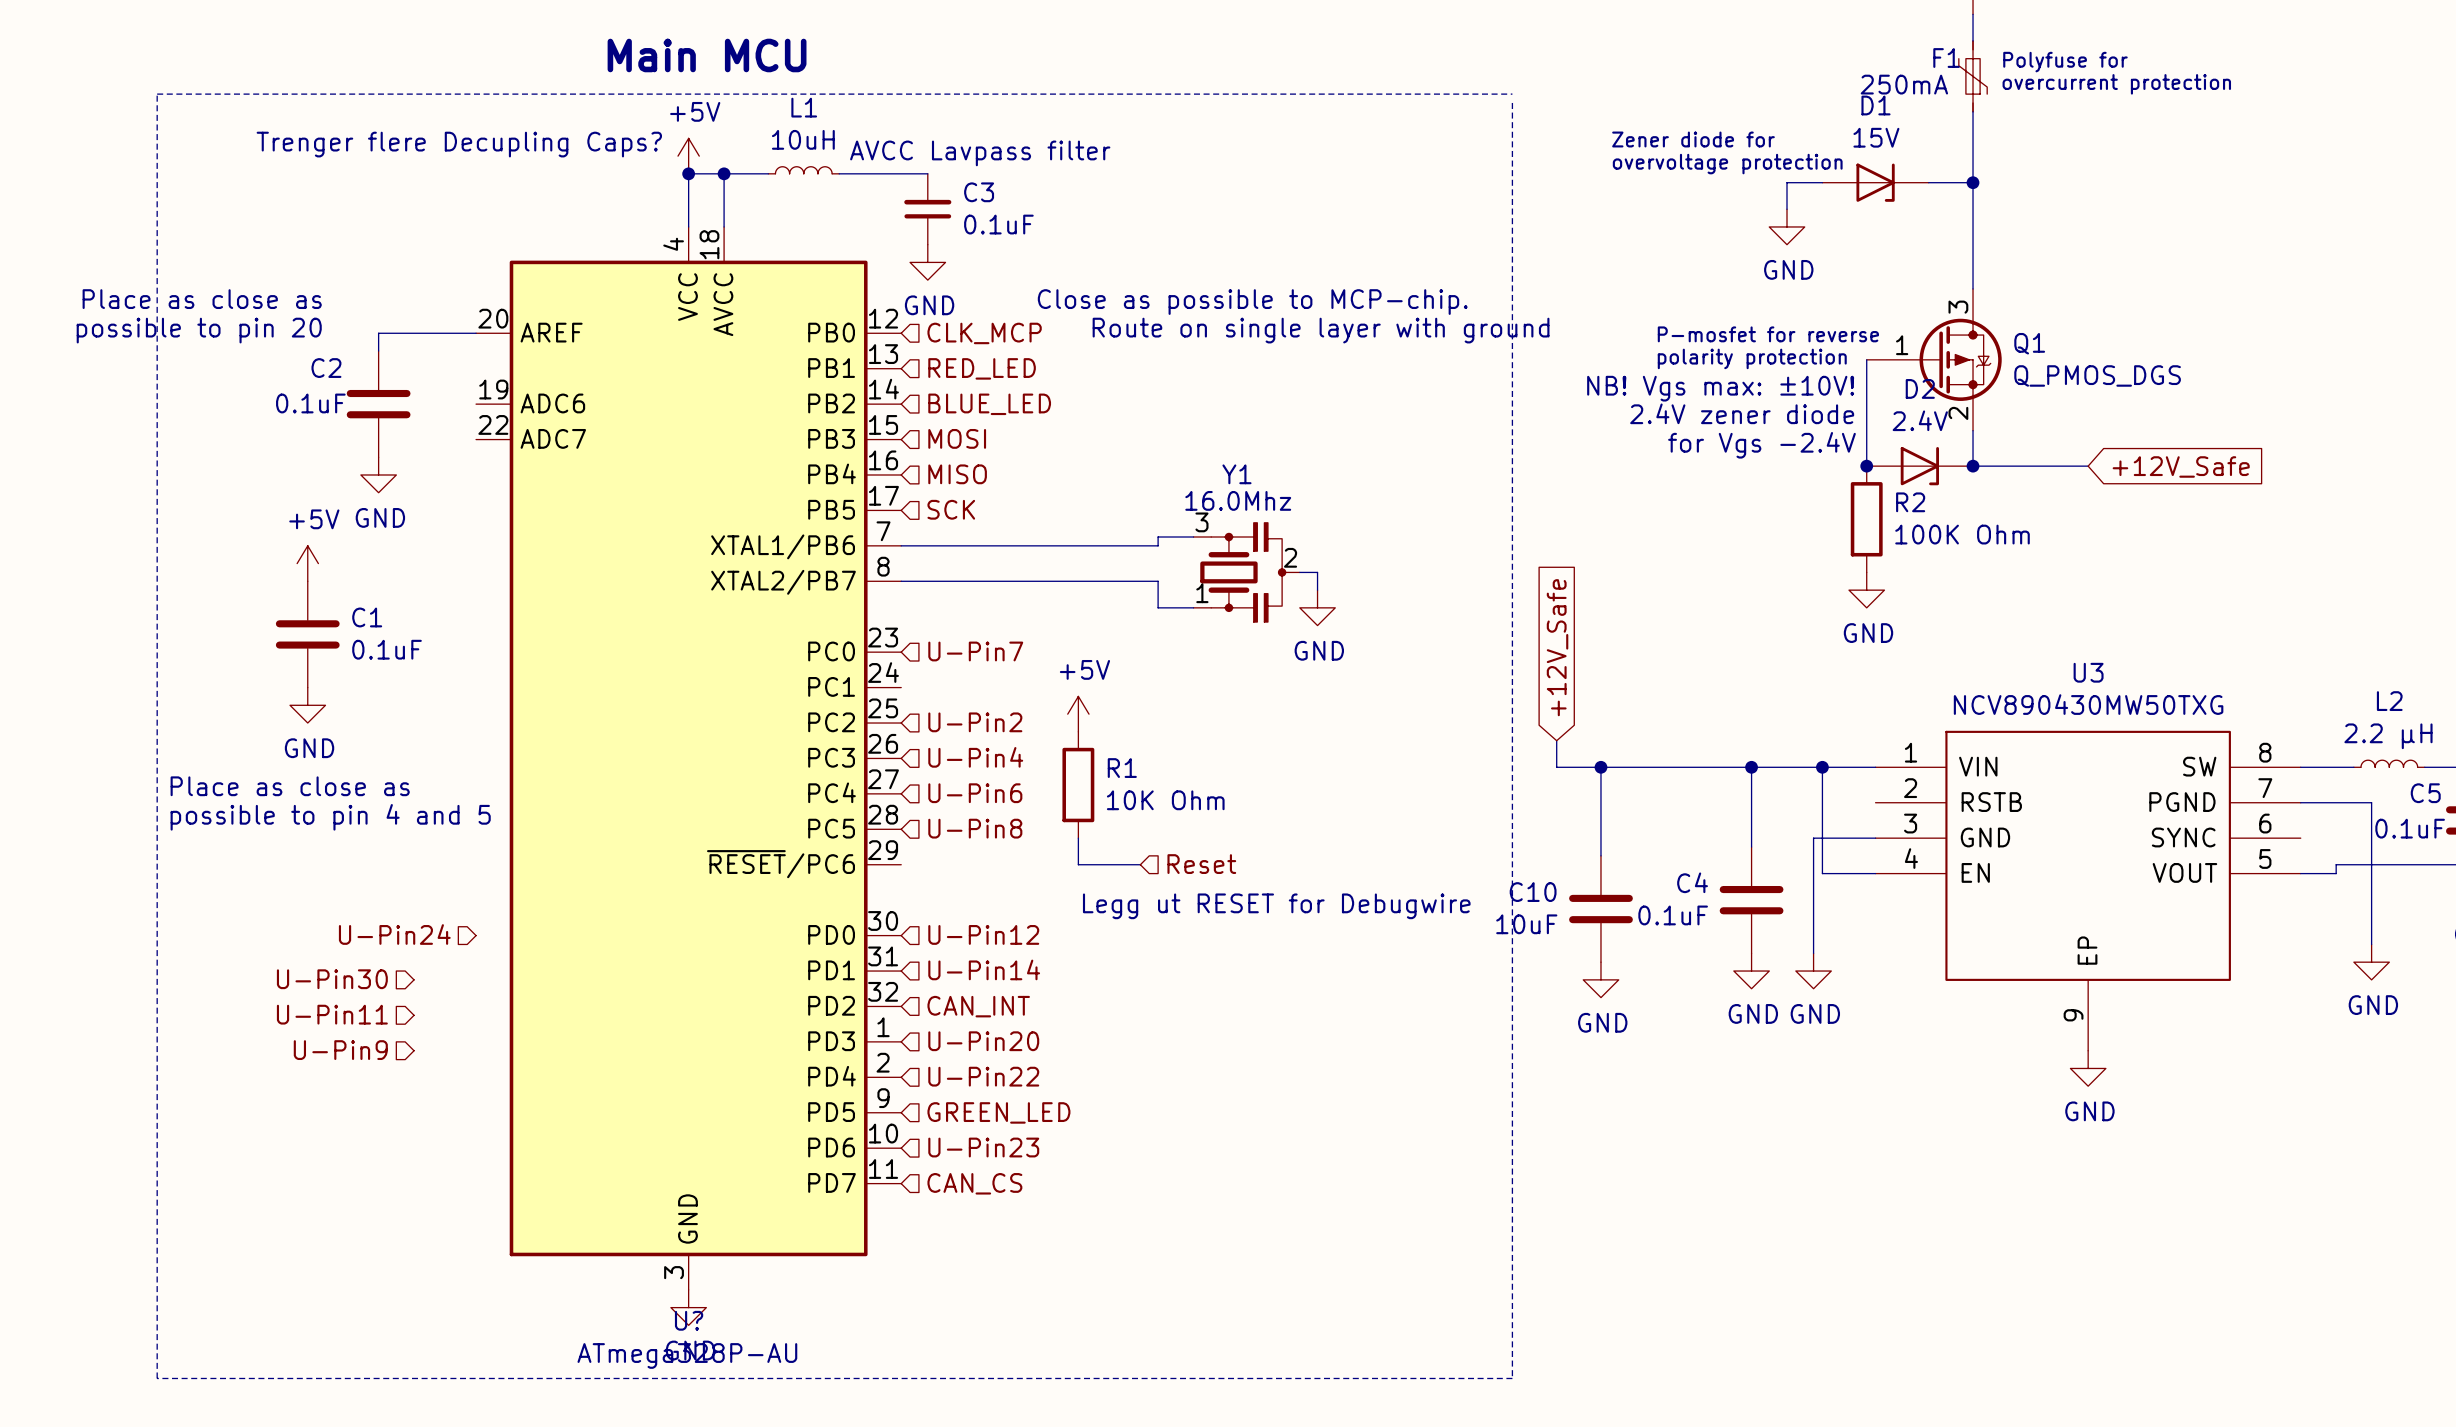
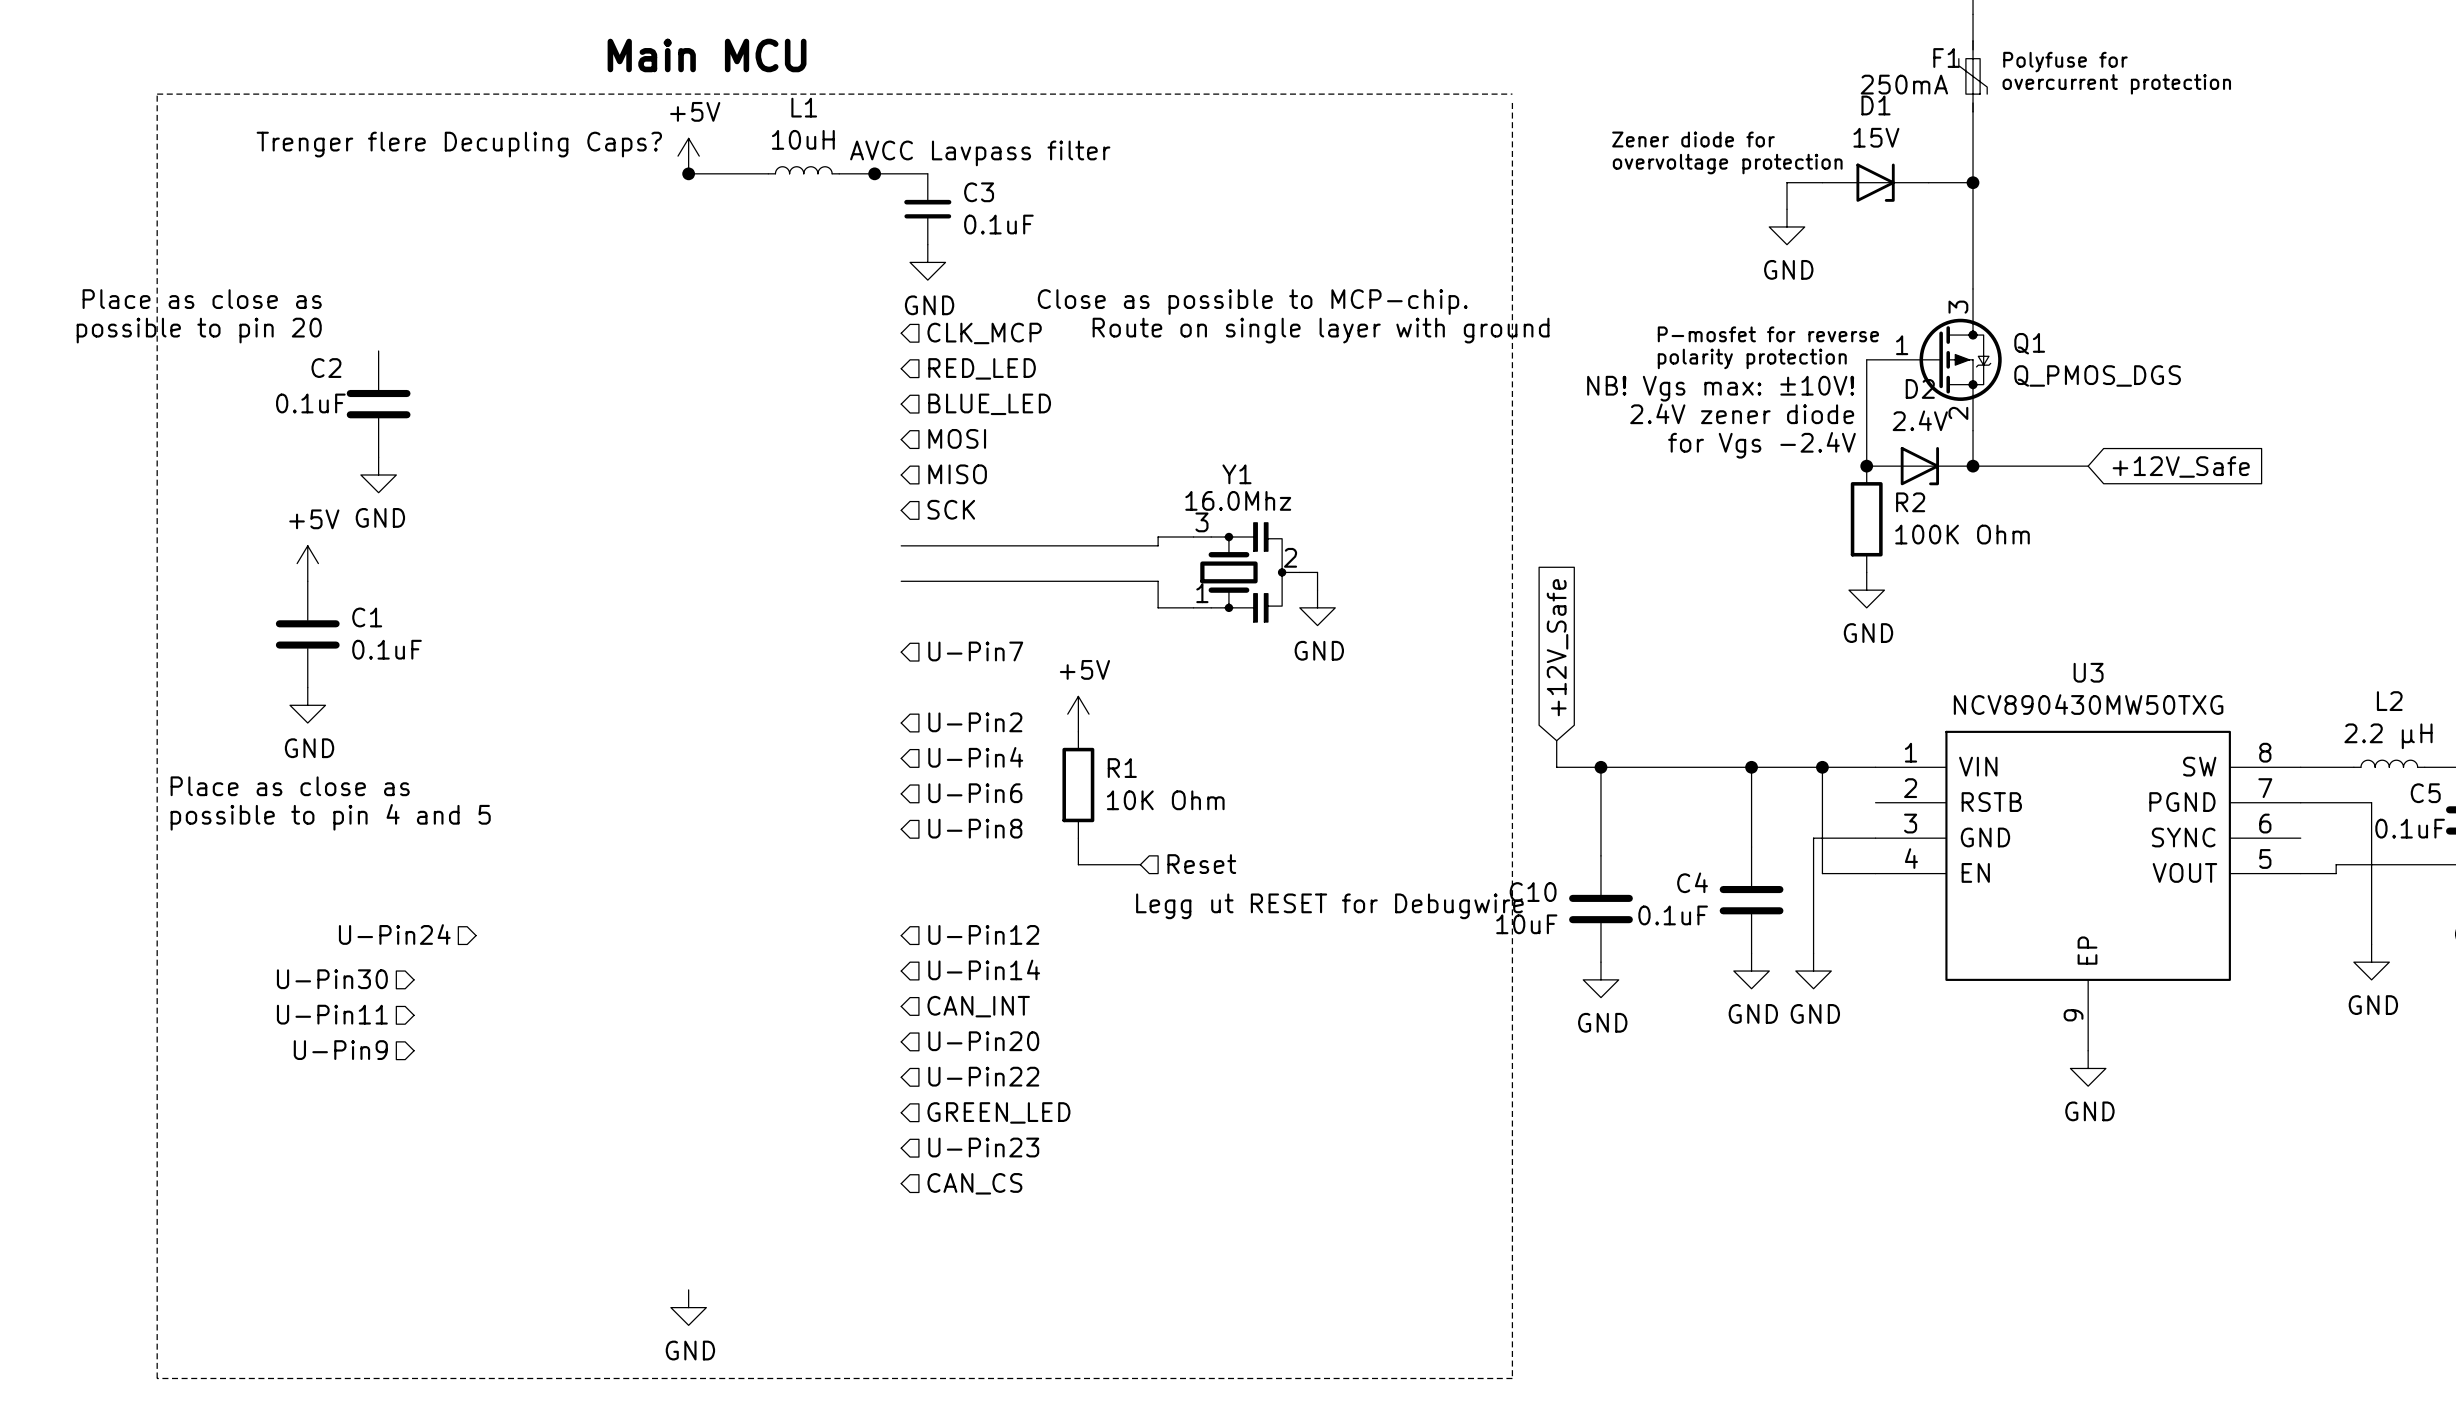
wire: (688, 173) (688, 226) -> none
wire: (724, 173) (724, 226) -> none
junction: (724, 173) -> none
junction: none -> (874, 173)
wire: (476, 333) (378, 333) (378, 350) -> none
U?: ATmega328P-AU (688, 758) -> none
text position: Legg ut RESET for Debugwire (1276, 906) -> Legg ut RESET for Debugwire (1329, 906)

